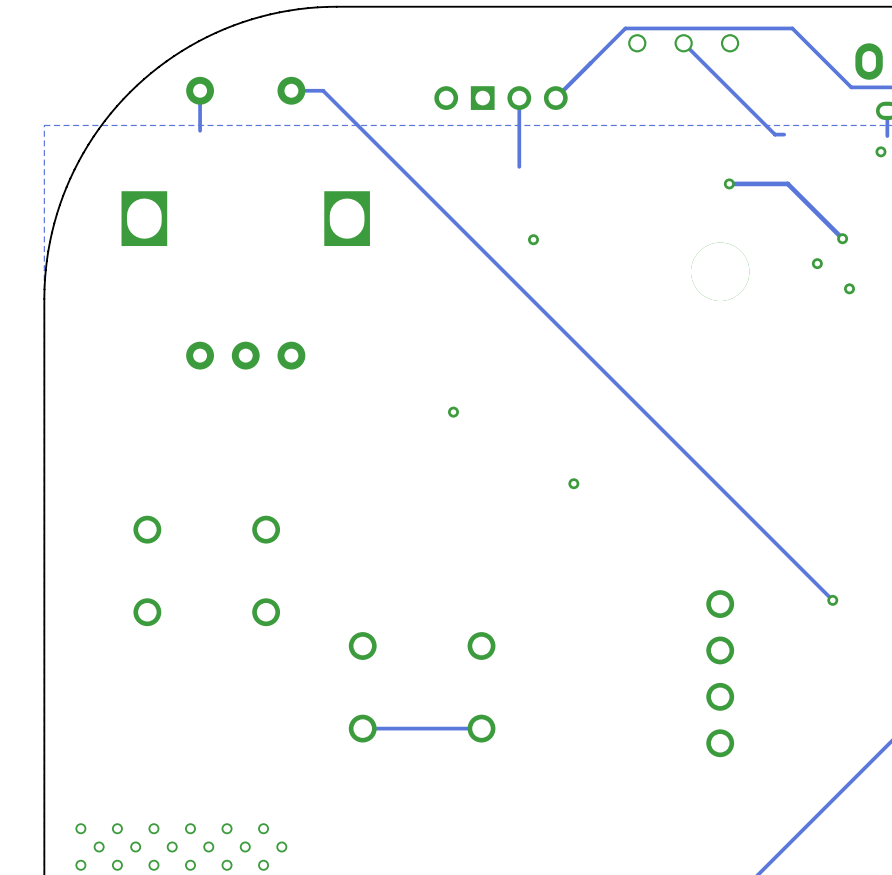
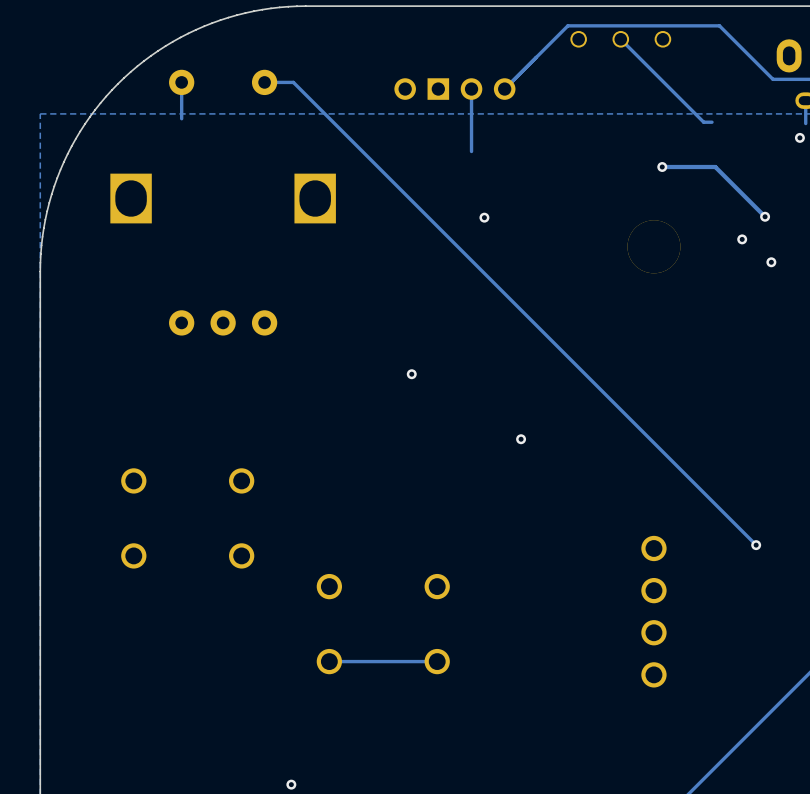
part: (80, 828) -> none
part: (117, 828) -> none
part: (153, 828) -> none
part: (190, 828) -> none
part: (227, 828) -> none
part: (263, 828) -> none
part: (99, 846) -> none
part: (135, 846) -> none
part: (172, 846) -> none
part: (208, 846) -> none
part: (245, 846) -> none
part: (281, 846) -> none
via: none -> (291, 784)
part: (80, 865) -> none
part: (117, 865) -> none
part: (153, 865) -> none
part: (190, 865) -> none
part: (227, 865) -> none
part: (263, 865) -> none

